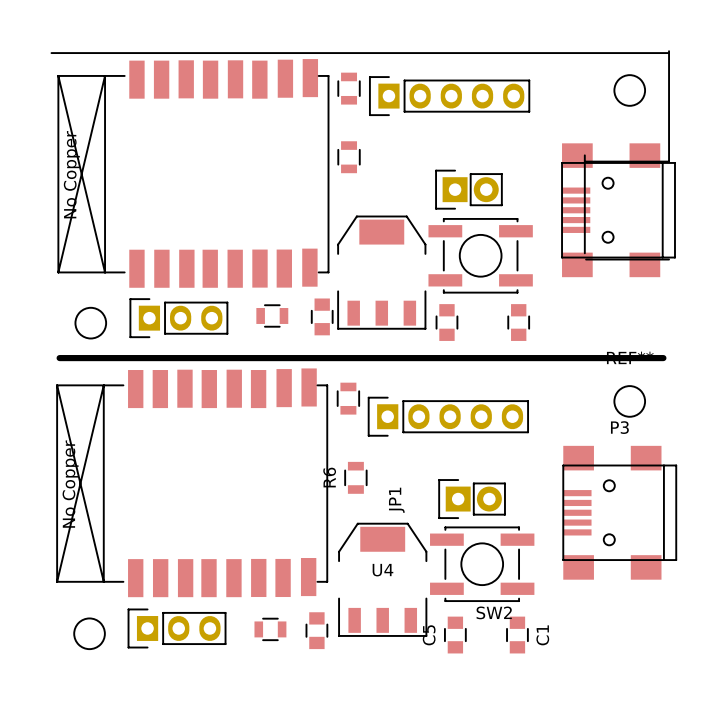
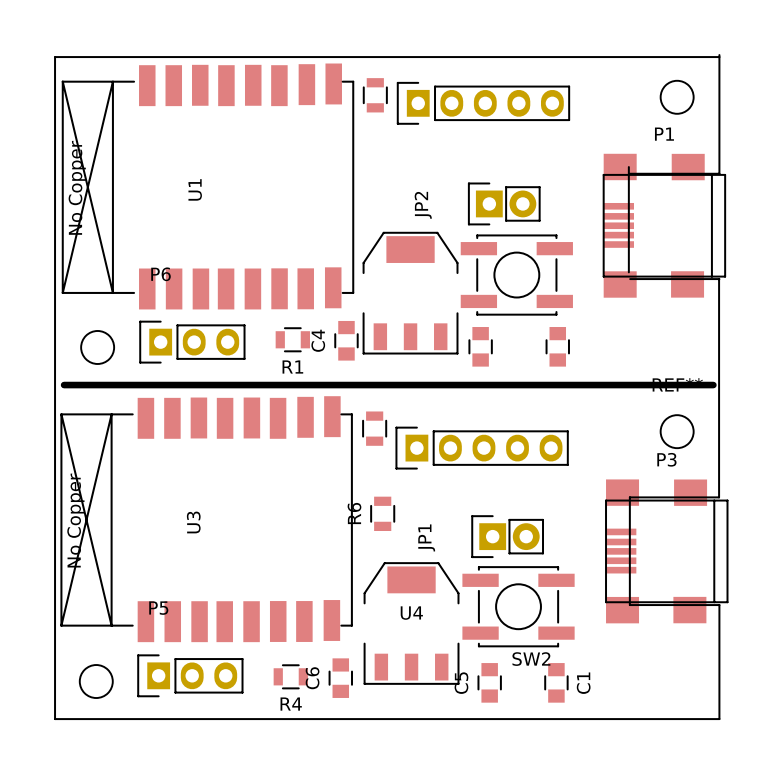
board edge: none -> (55, 57) (55, 719) (719, 719) (719, 605) (629, 605) (629, 497) (719, 497) (719, 279)
part: (349, 157) -> none
U1 name: none -> U1 (195, 189)
JP2 name: none -> JP2 (423, 205)
P1: none -> (664, 225)
part: (618, 210) -> none
P6 name: none -> P6 (161, 274)
C4 name: none -> C4 (318, 340)
R1 name: none -> R1 (292, 367)
P3 footprint: [562, 445, 678, 580] -> [605, 479, 729, 624]
U3 name: none -> U3 (193, 522)
P5 name: none -> P5 (158, 608)
C6 name: none -> C6 (312, 678)
R4 name: none -> R4 (291, 704)

